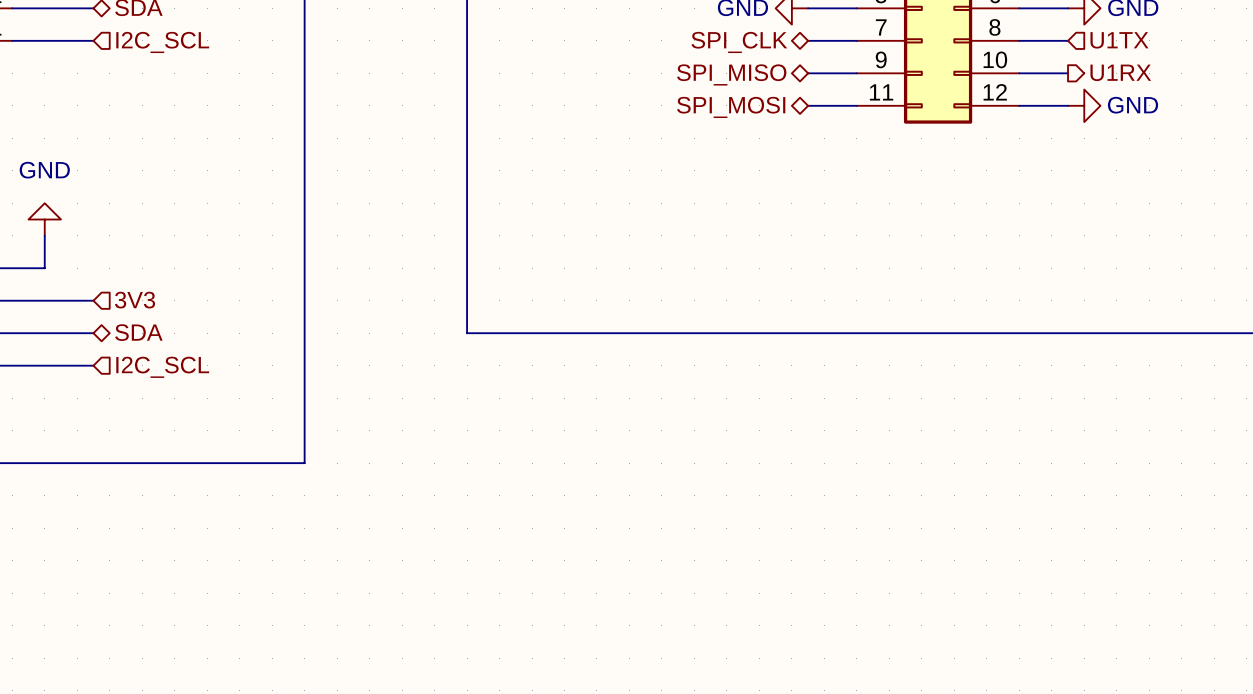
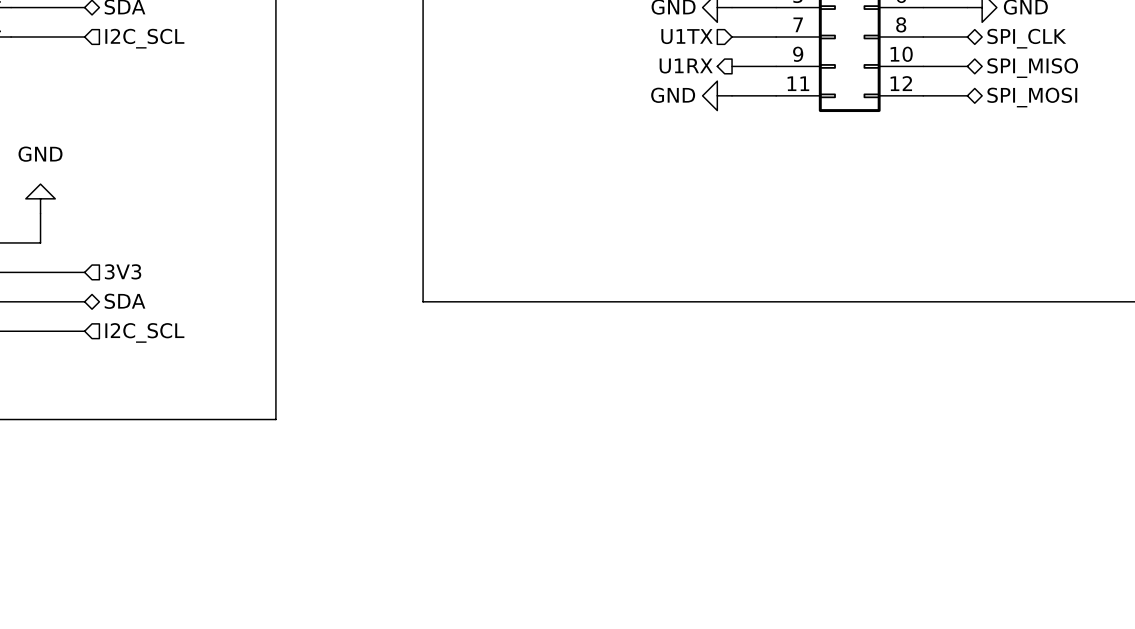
hierarchical label shape: input (1119, 40) -> bidirectional (1026, 38)
hierarchical label: U1TX (1119, 40) -> SPI_CLK (1026, 38)
hierarchical label shape: bidirectional (739, 42) -> input (687, 36)
hierarchical label: SPI_CLK (739, 42) -> U1TX (687, 36)
hierarchical label shape: output (1120, 72) -> bidirectional (1032, 68)
hierarchical label: U1RX (1120, 72) -> SPI_MISO (1032, 68)
hierarchical label shape: bidirectional (731, 74) -> output (686, 66)
hierarchical label: SPI_MISO (731, 74) -> U1RX (686, 66)
power symbol rotation: 0° (1084, 105) -> 180° (717, 95)
power symbol position: GND (1084, 105) -> GND (717, 95)
hierarchical label rotation: 0° (731, 107) -> 180° (1032, 97)
hierarchical label position: SPI_MOSI (731, 107) -> SPI_MOSI (1032, 97)

